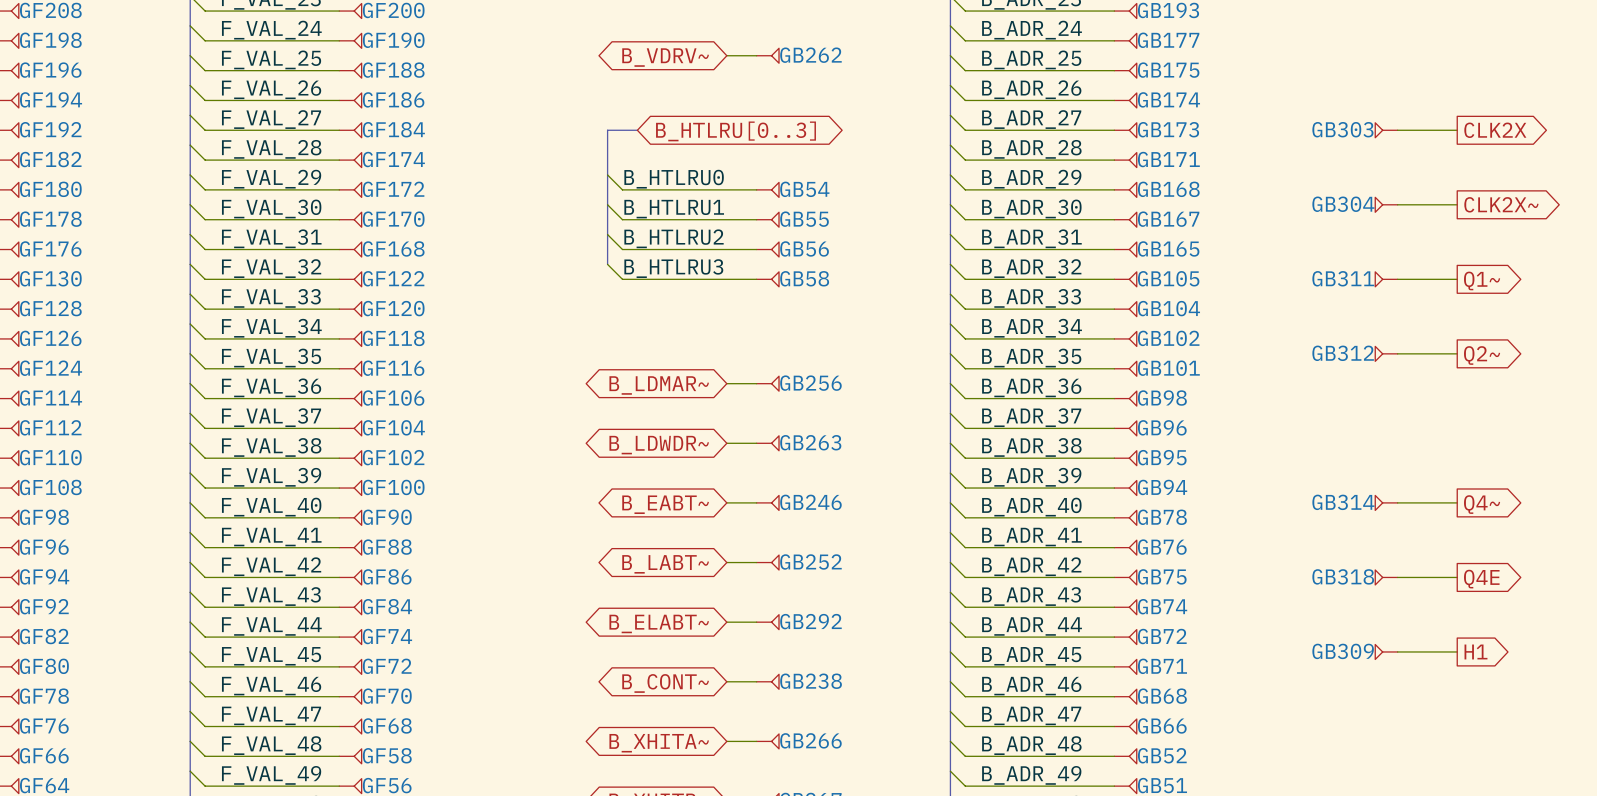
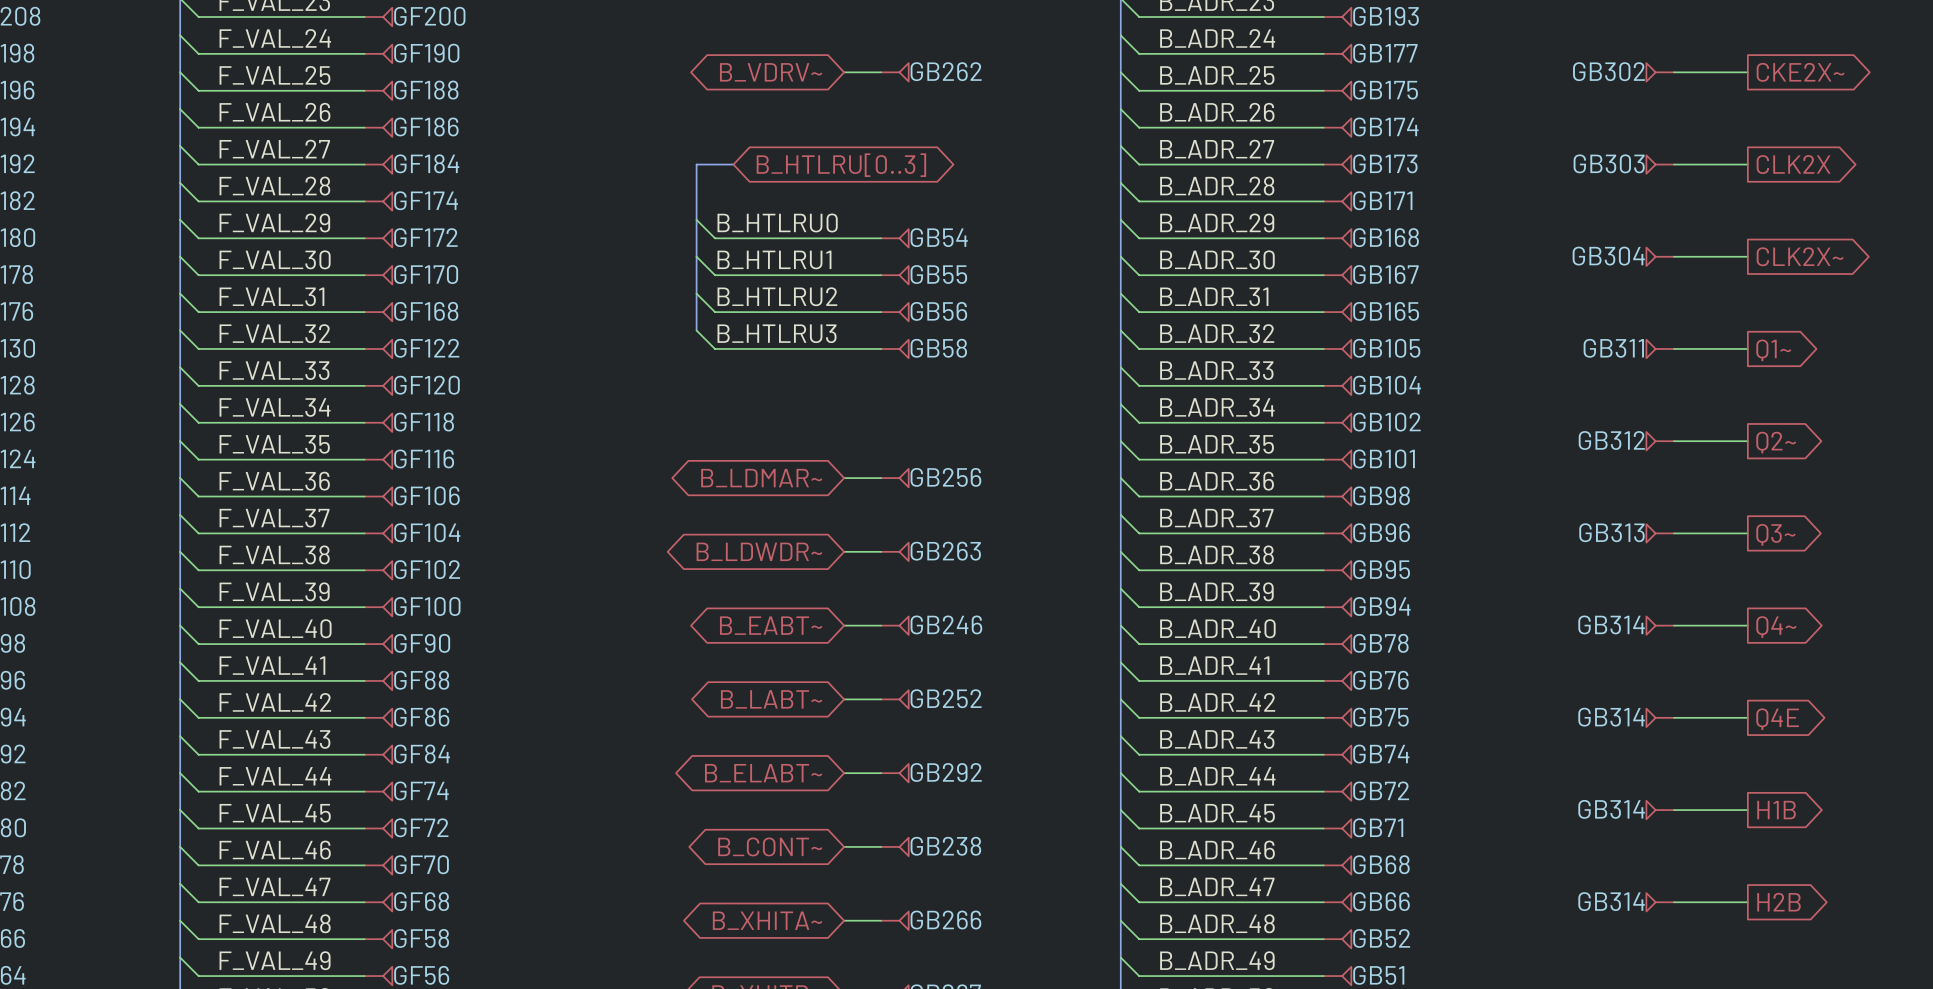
GB302: none -> (1659, 72)
wire: none -> (1674, 72) (1747, 72)
global label: none -> CKE2X~ (1800, 72)
GB313: none -> (1659, 533)
wire: none -> (1674, 533) (1747, 533)
global label: none -> Q3~ (1775, 534)
GB318 name: GB318 (1343, 576) -> GB314 (1611, 717)
GB309 name: GB309 (1343, 651) -> GB314 (1611, 809)
global label: H1 (1475, 651) -> H1B (1776, 810)
GB314: none -> (1659, 902)
wire: none -> (1674, 902) (1747, 902)
global label: none -> H2B (1778, 902)

